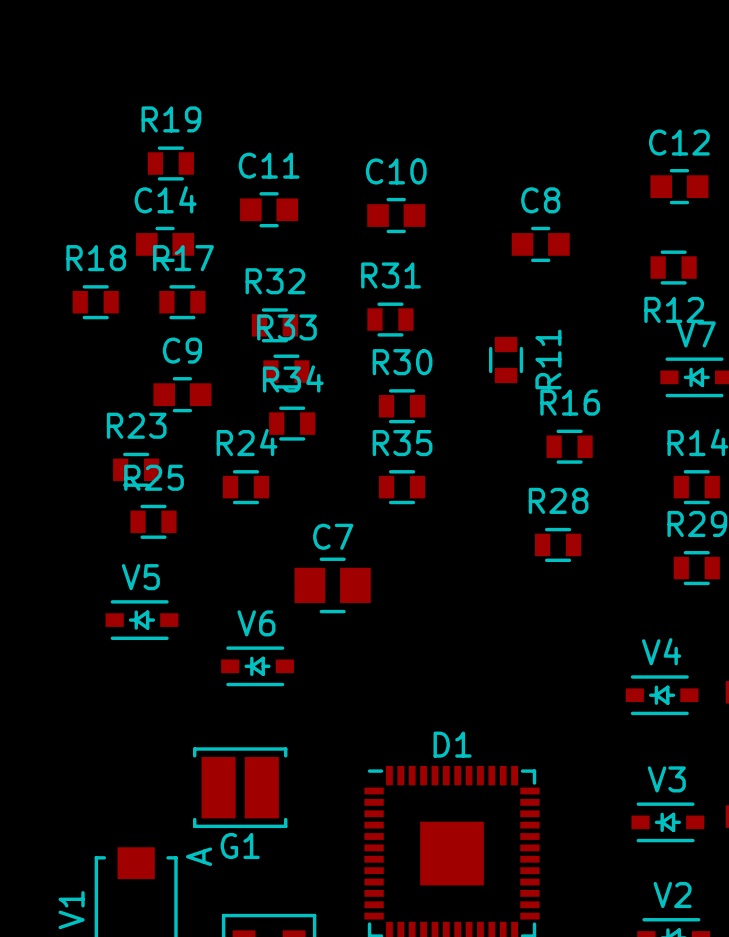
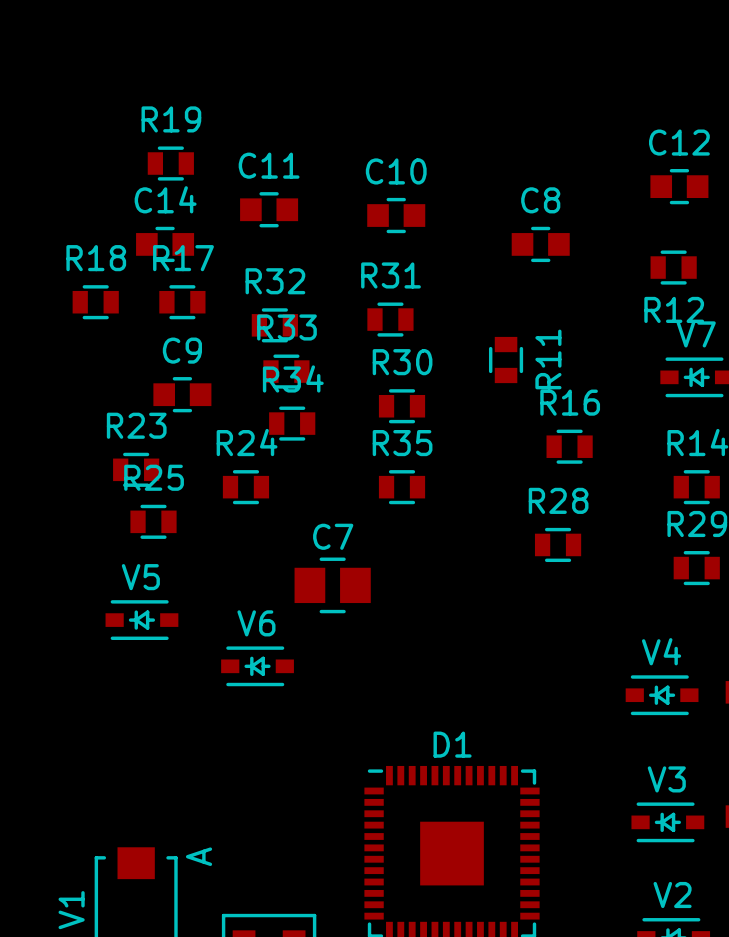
G1: (240, 787) -> none

